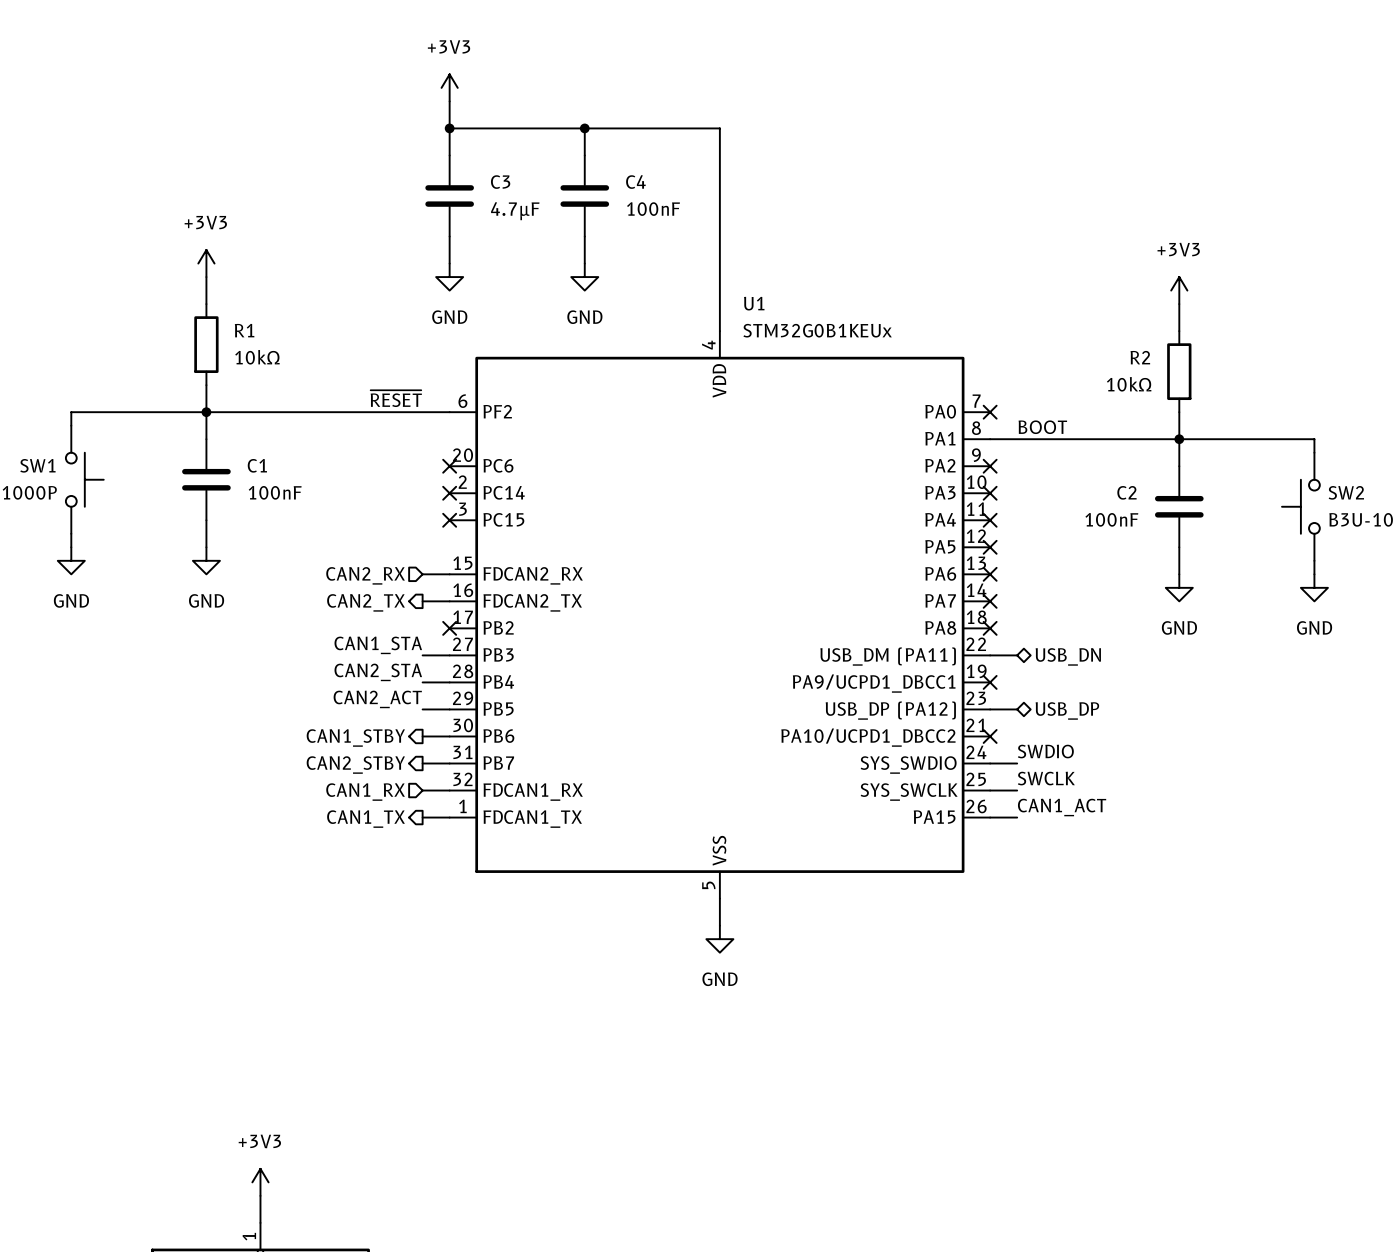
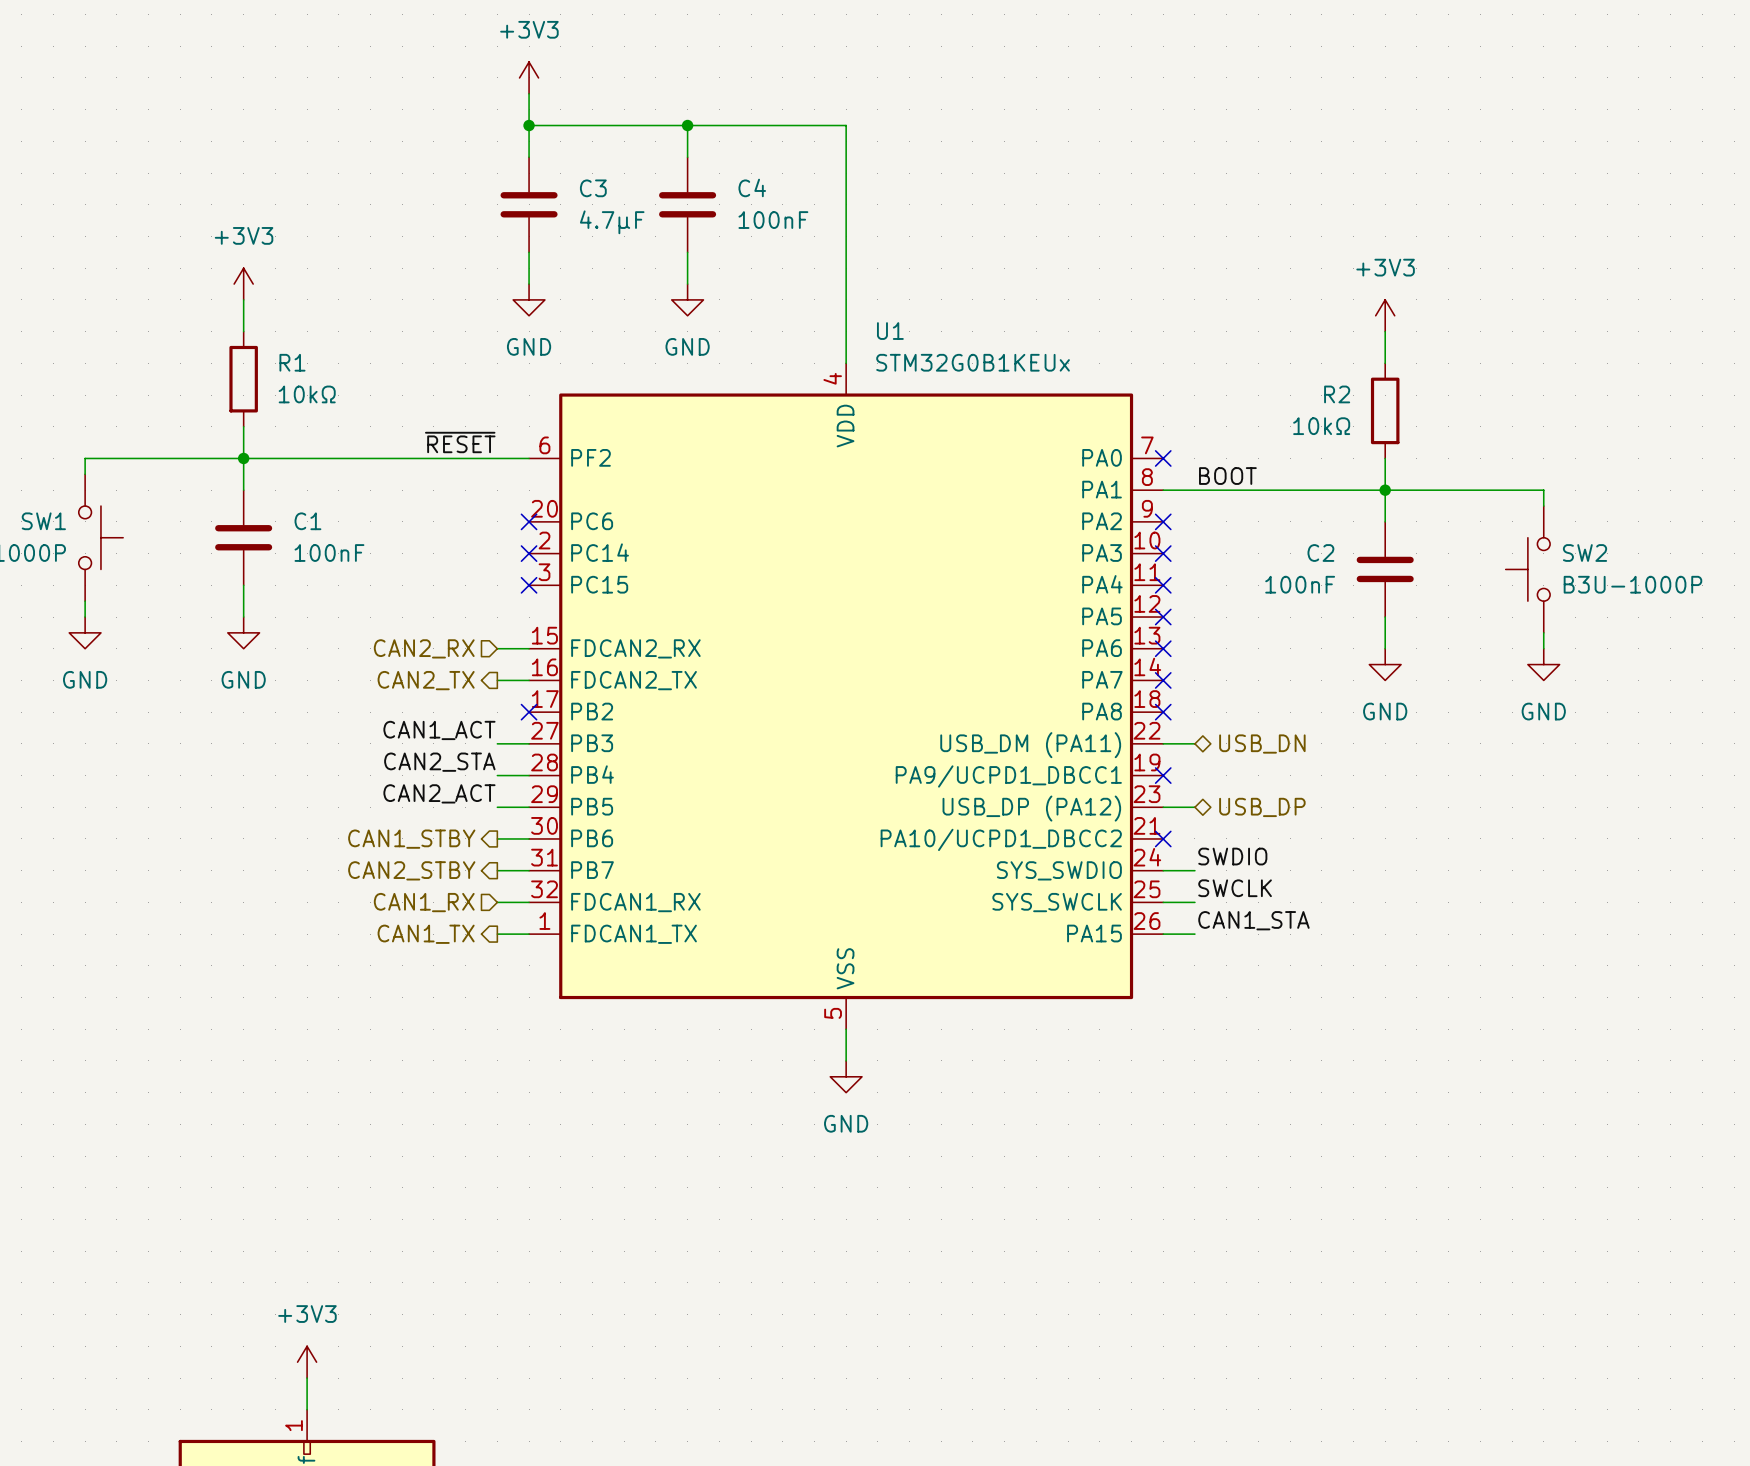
label: CAN1_STA (378, 645) -> CAN1_ACT (439, 730)
label: CAN1_ACT (1062, 807) -> CAN1_STA (1253, 920)

